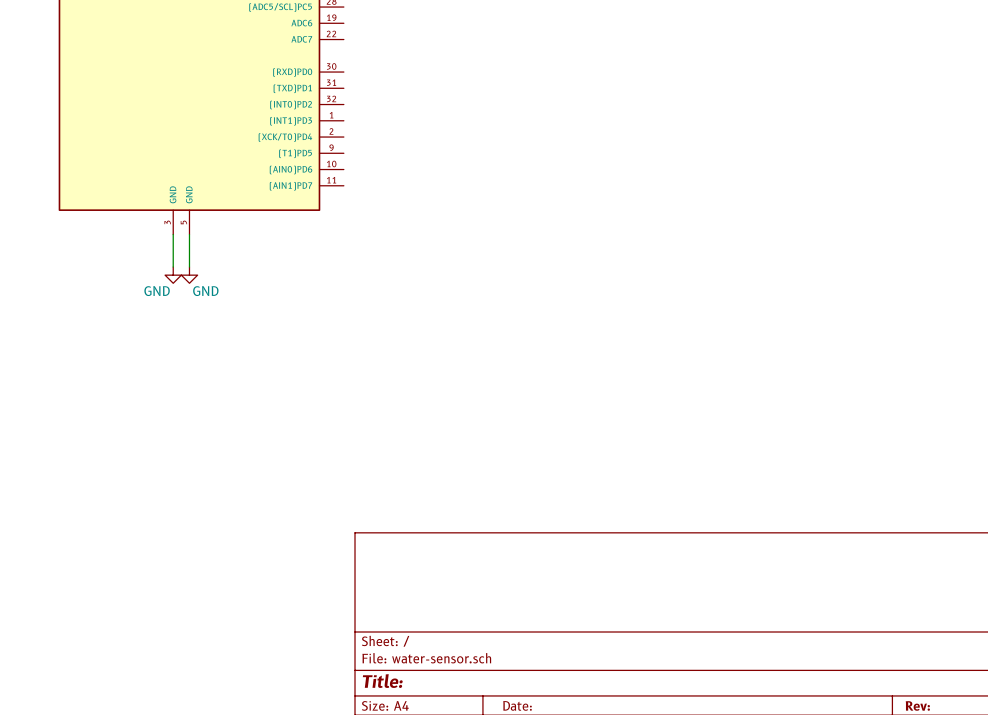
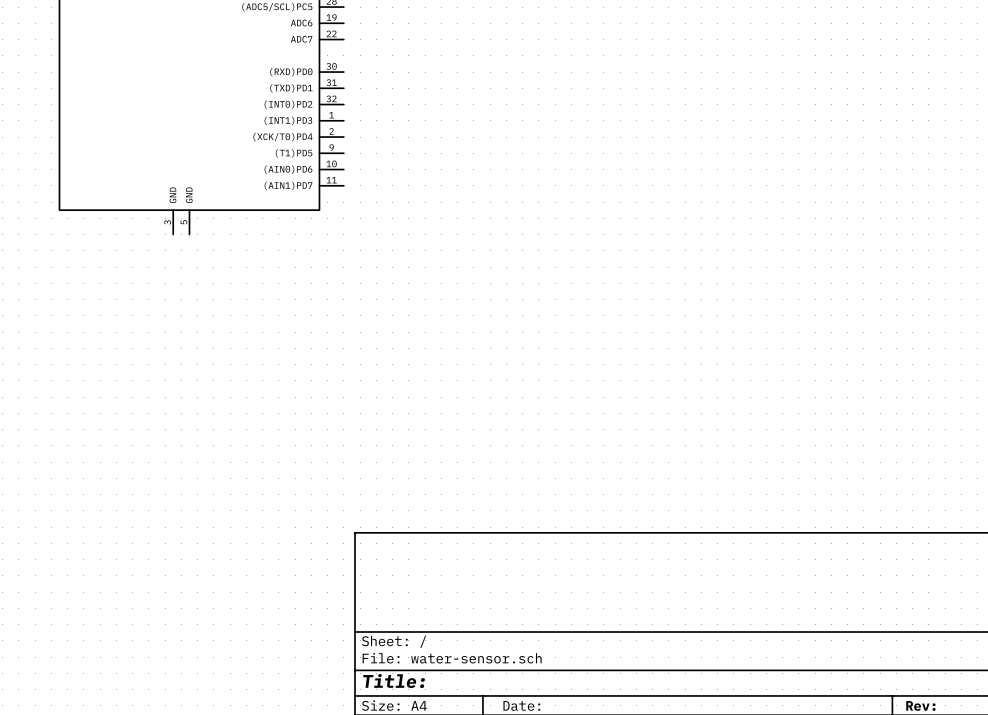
wire: (173, 234) (173, 267) -> none
wire: (189, 234) (189, 267) -> none
power symbol: GND (173, 275) -> none
power symbol: GND (189, 275) -> none

